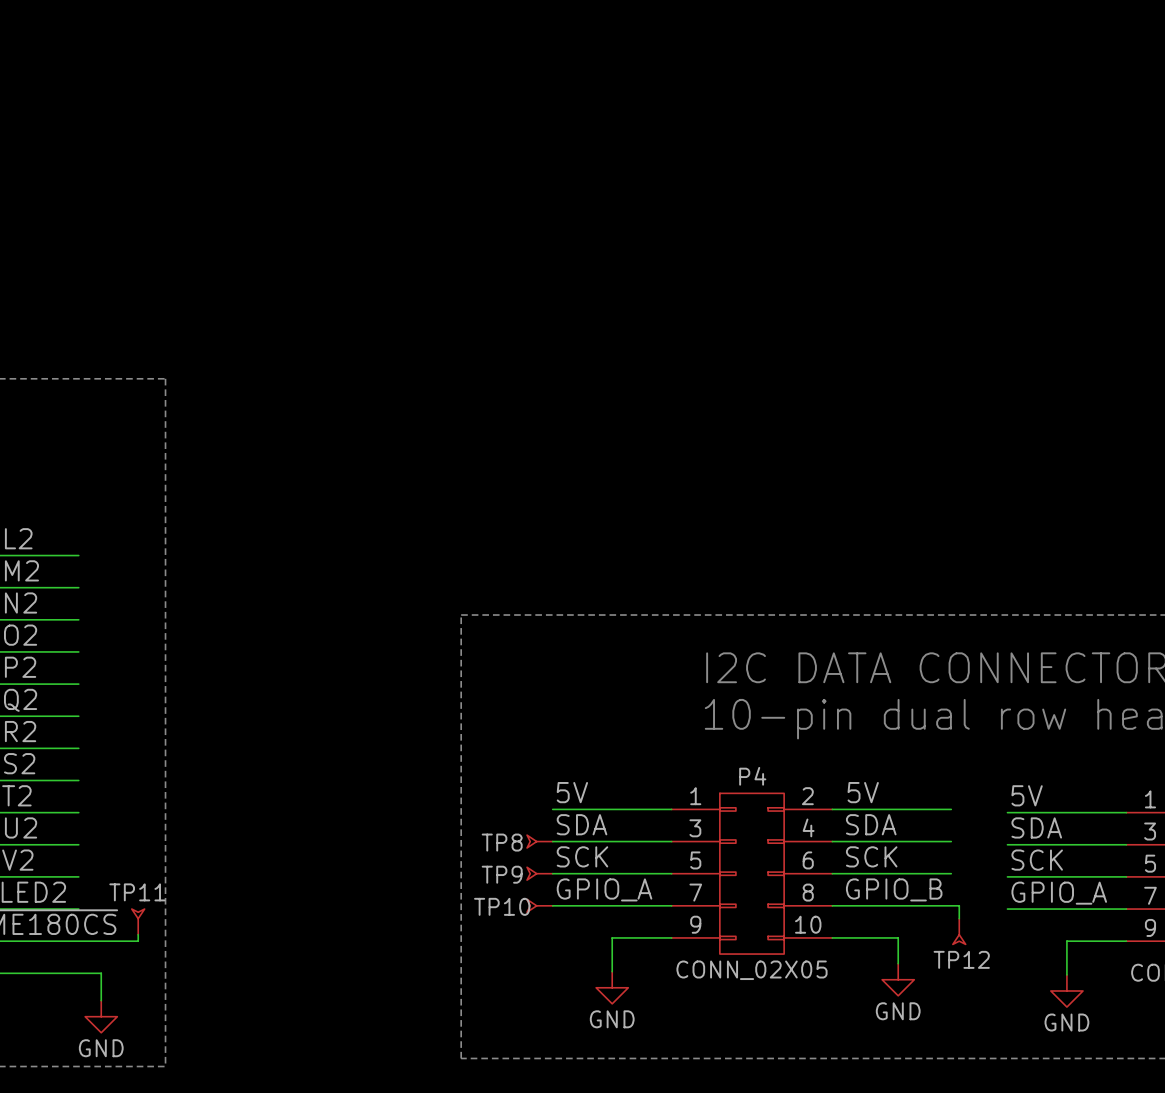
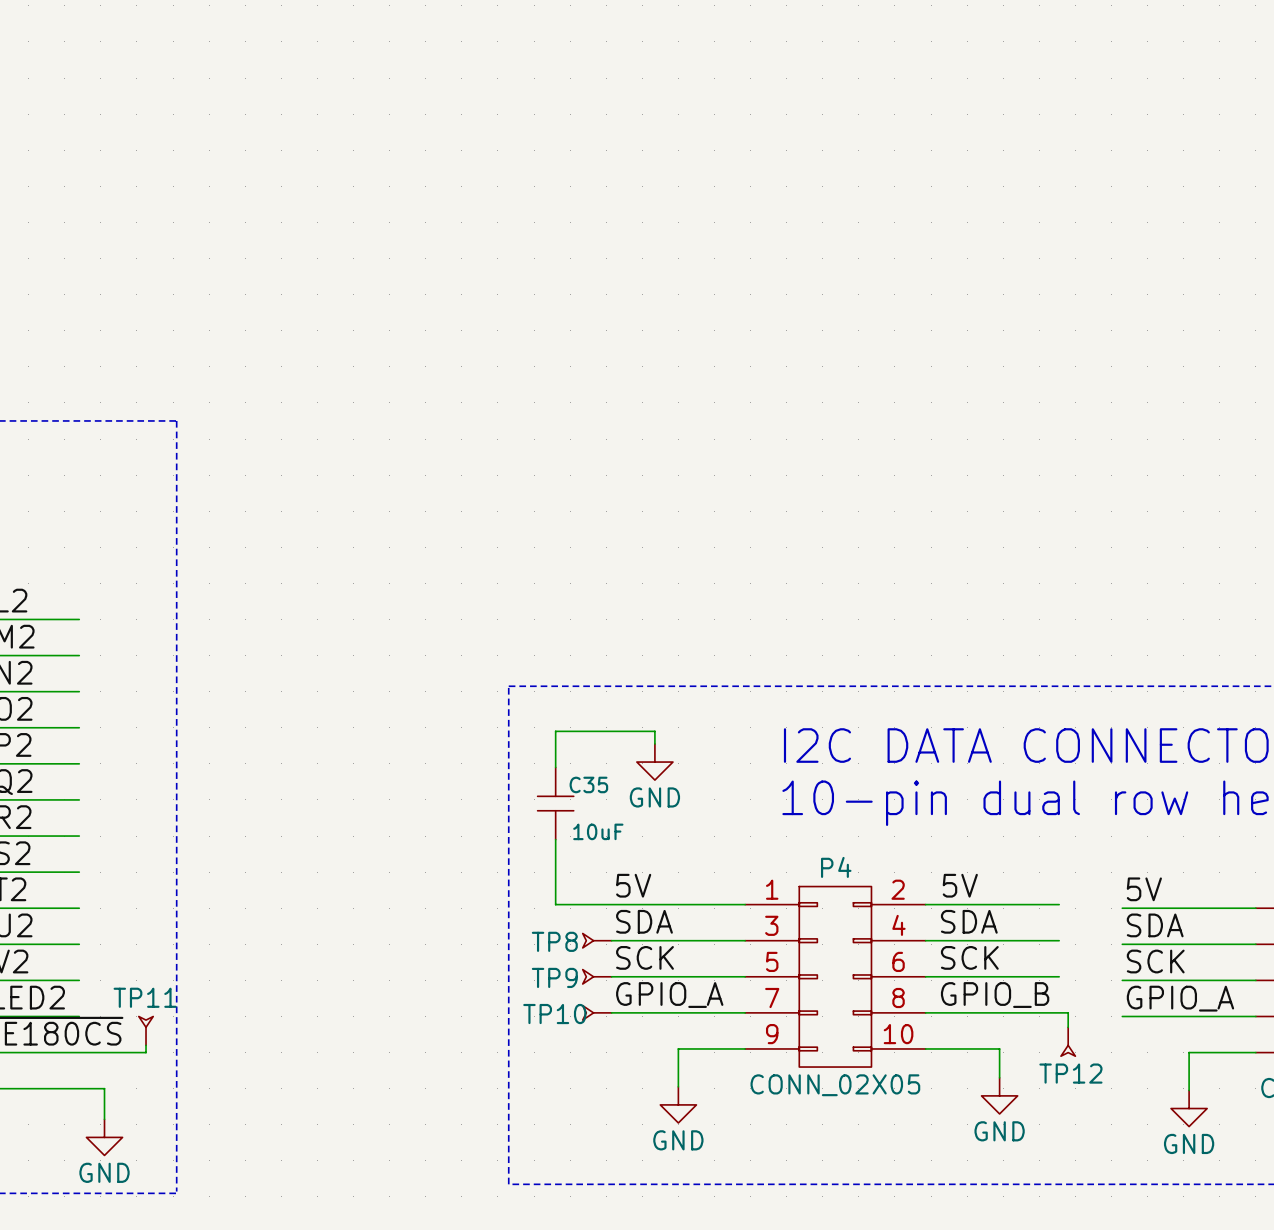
wire: none -> (654, 744) (654, 731) (555, 731) (555, 767)
power symbol: none -> GND (654, 762)
C35: none -> 10uF (555, 803)
wire: none -> (555, 839) (555, 904) (611, 904)

